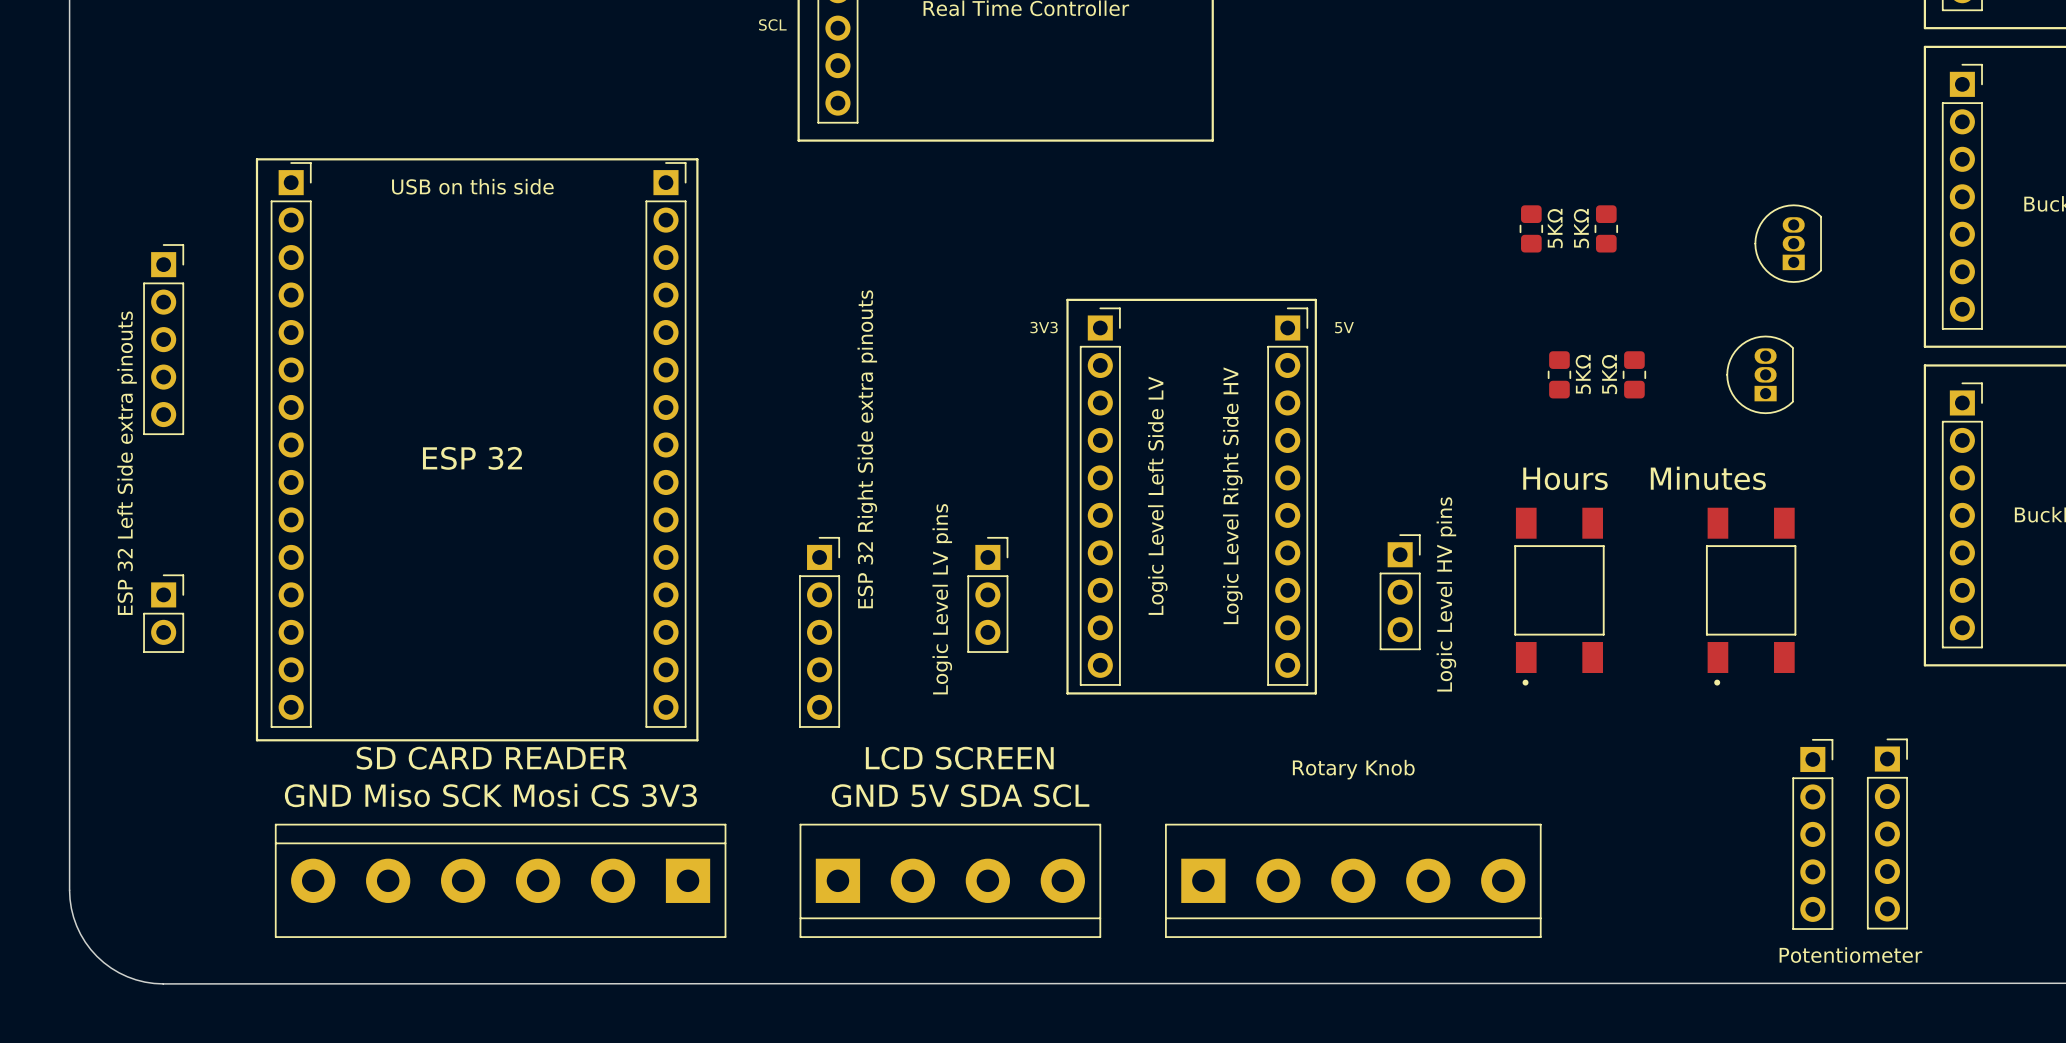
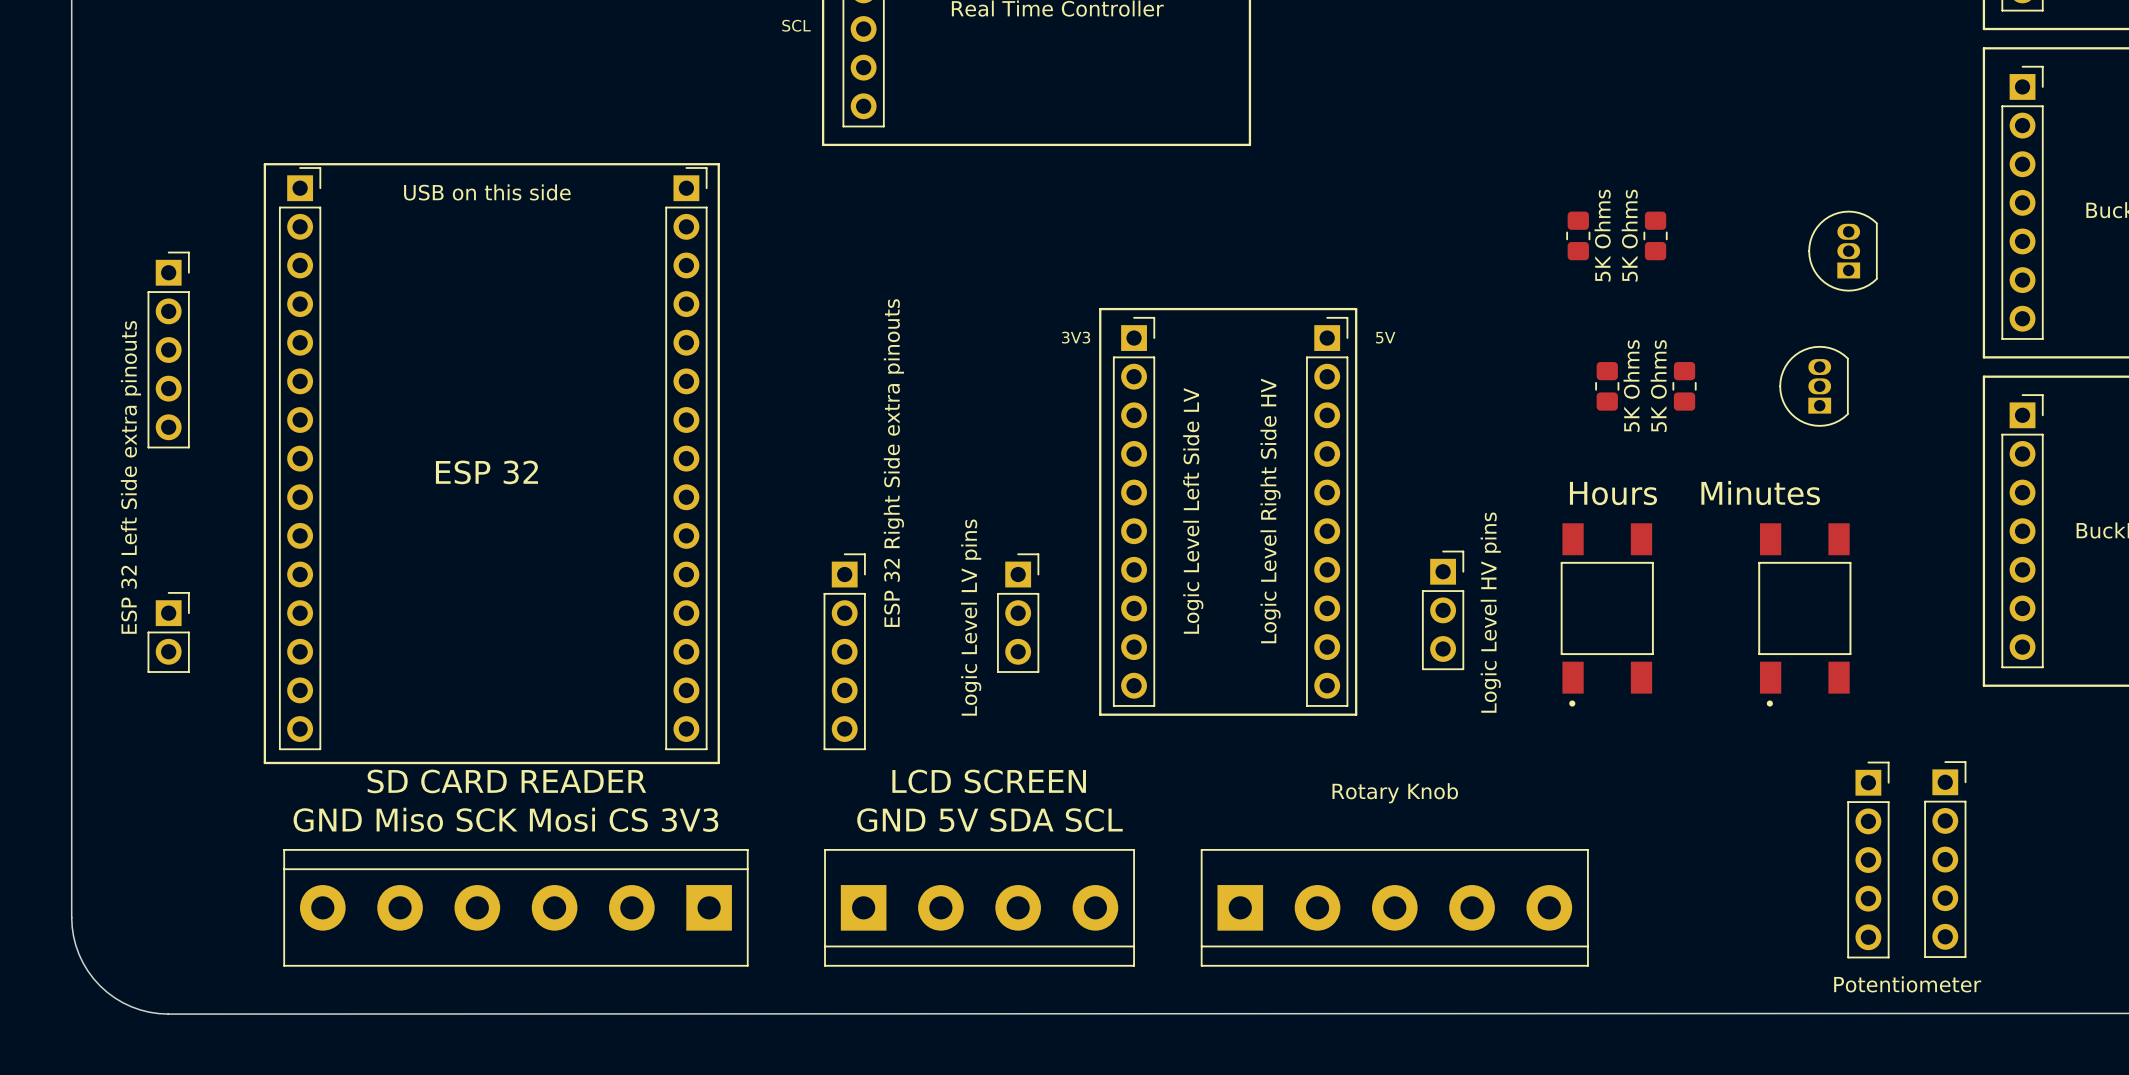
part value: 5KΩ (1555, 228) -> 5K Ohms (1602, 235)
part value: 5KΩ (1581, 228) -> 5K Ohms (1629, 235)
part value: 5KΩ (1583, 374) -> 5K Ohms (1631, 386)
part value: 5KΩ (1609, 374) -> 5K Ohms (1658, 386)

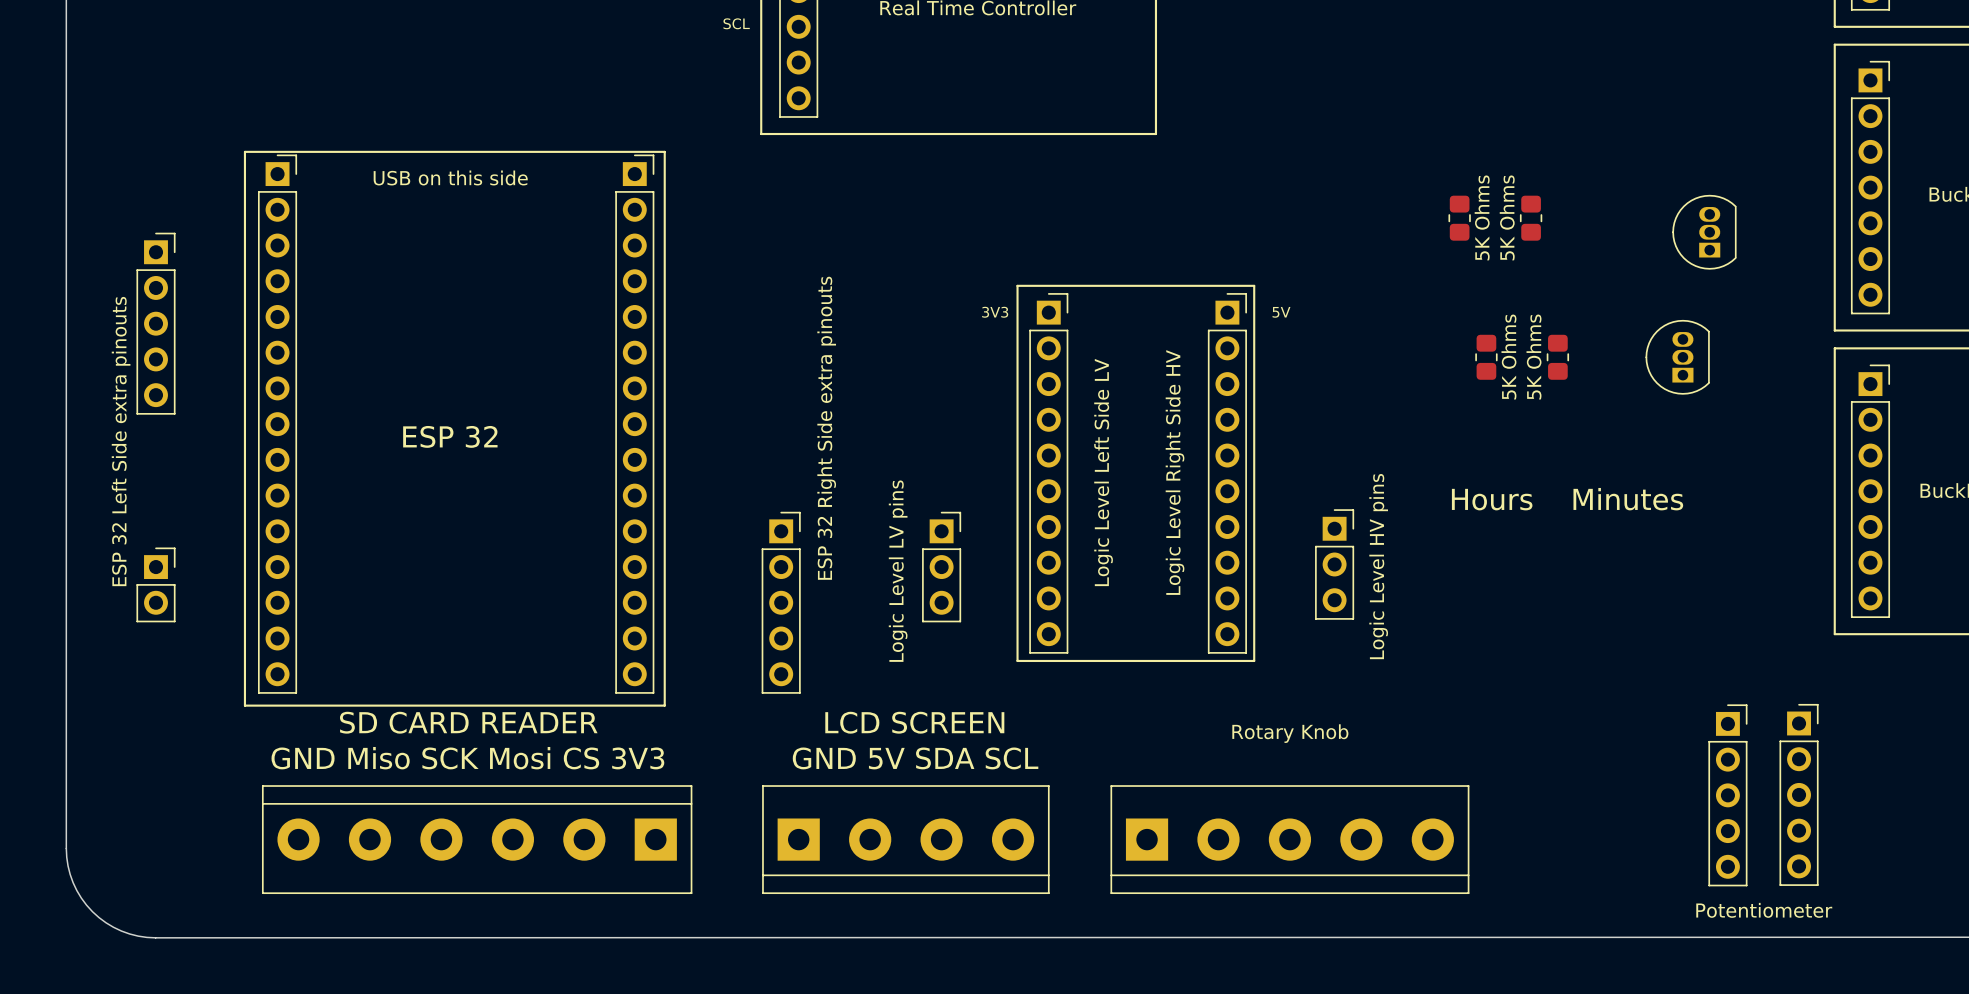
text position: Hours Minutes (1694, 493) -> Hours Minutes (1567, 499)
part: (1607, 614) -> none
part: (1804, 614) -> none

